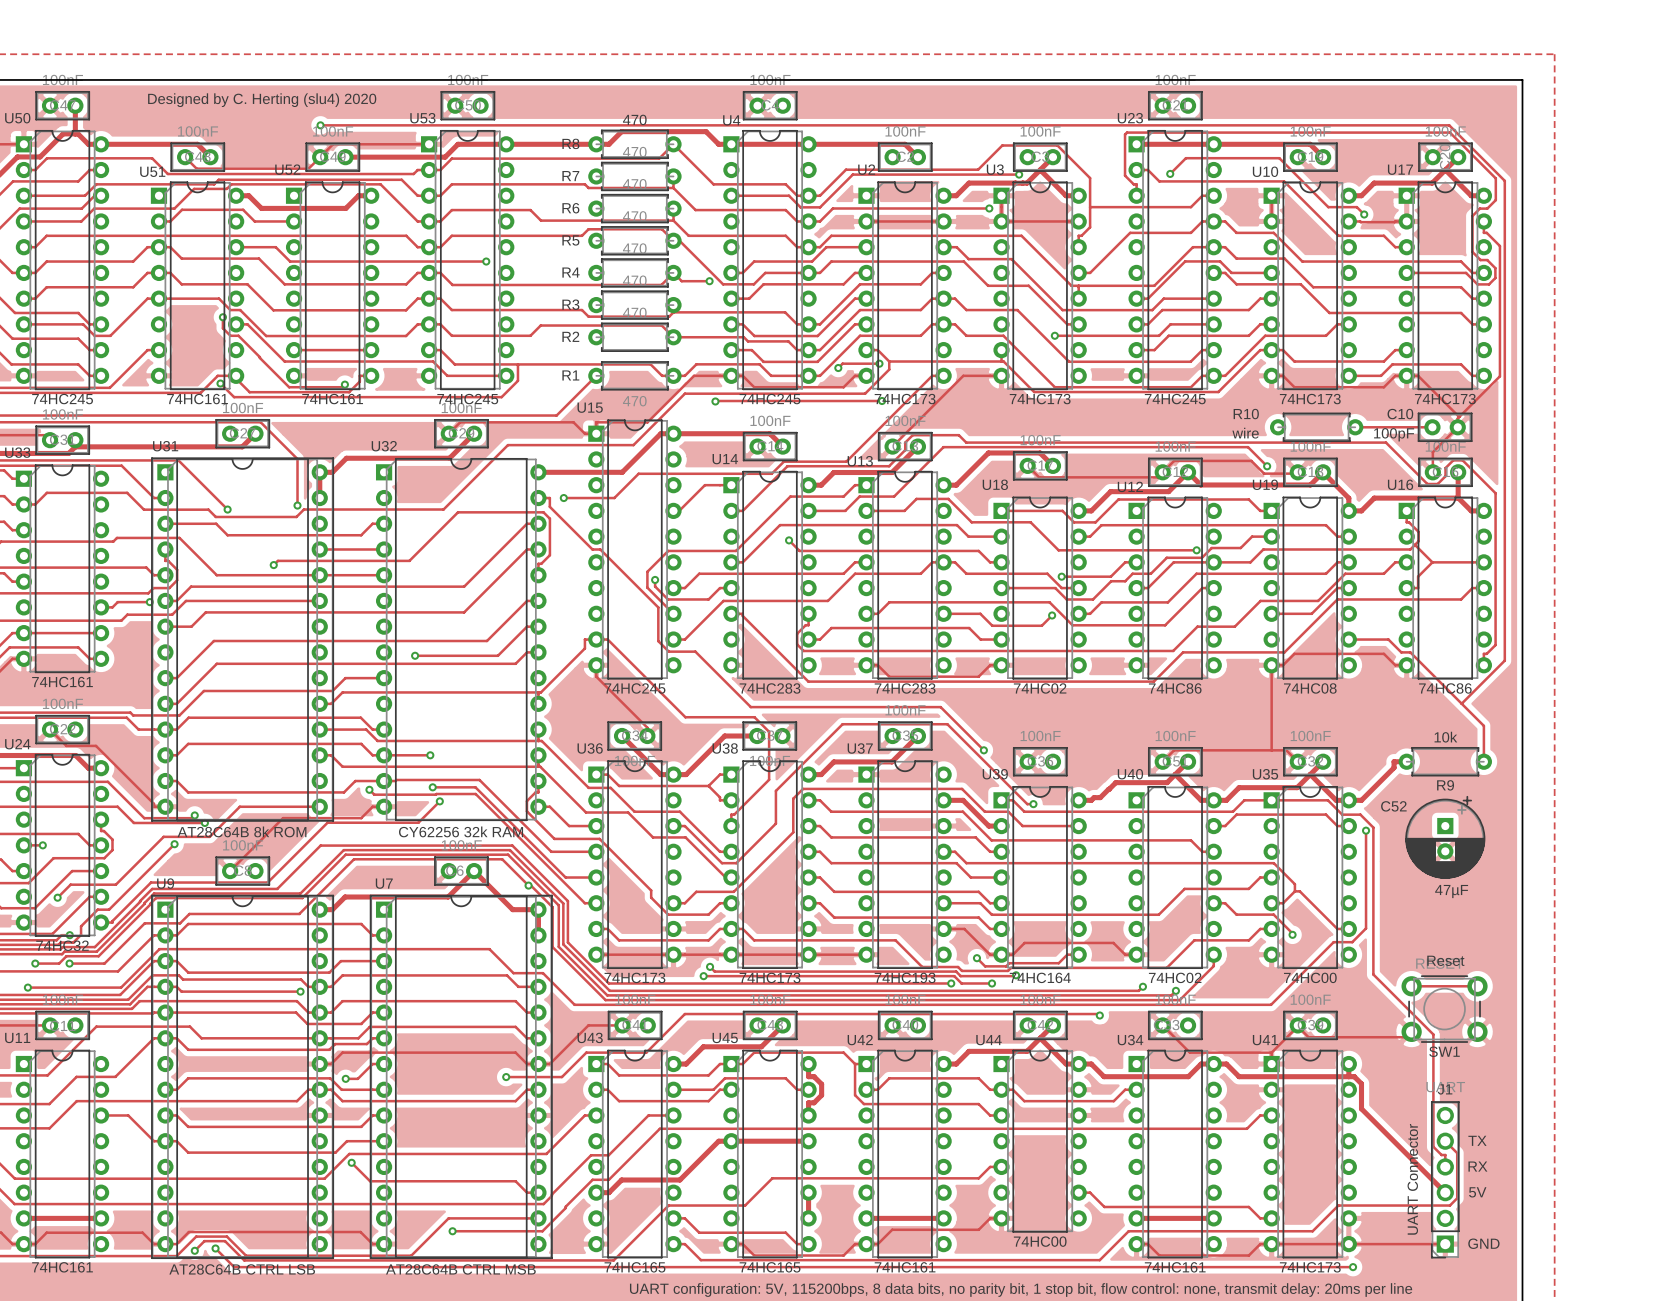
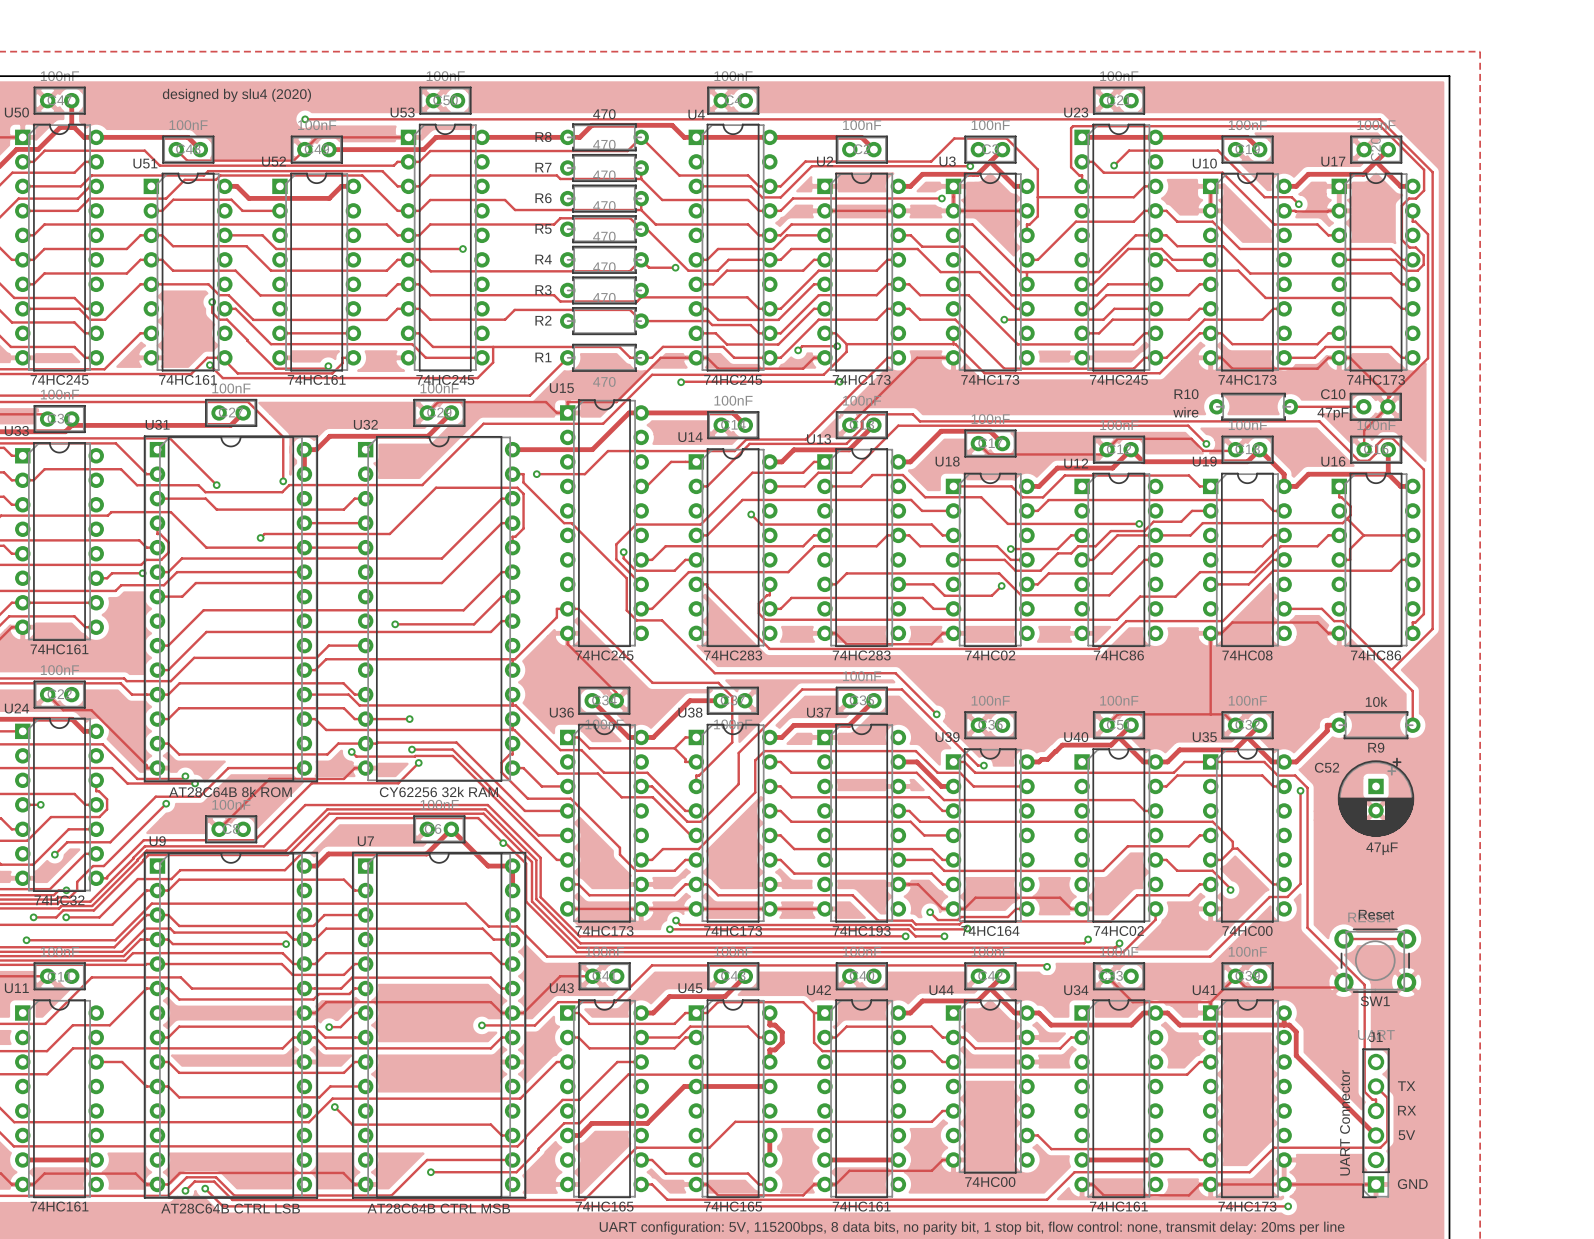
text: Designed by C. Herting (slu4) 2020 (262, 100) -> designed by slu4 (2020) (236, 95)
C10 value: 100pF (1394, 434) -> 47pF (1333, 414)

